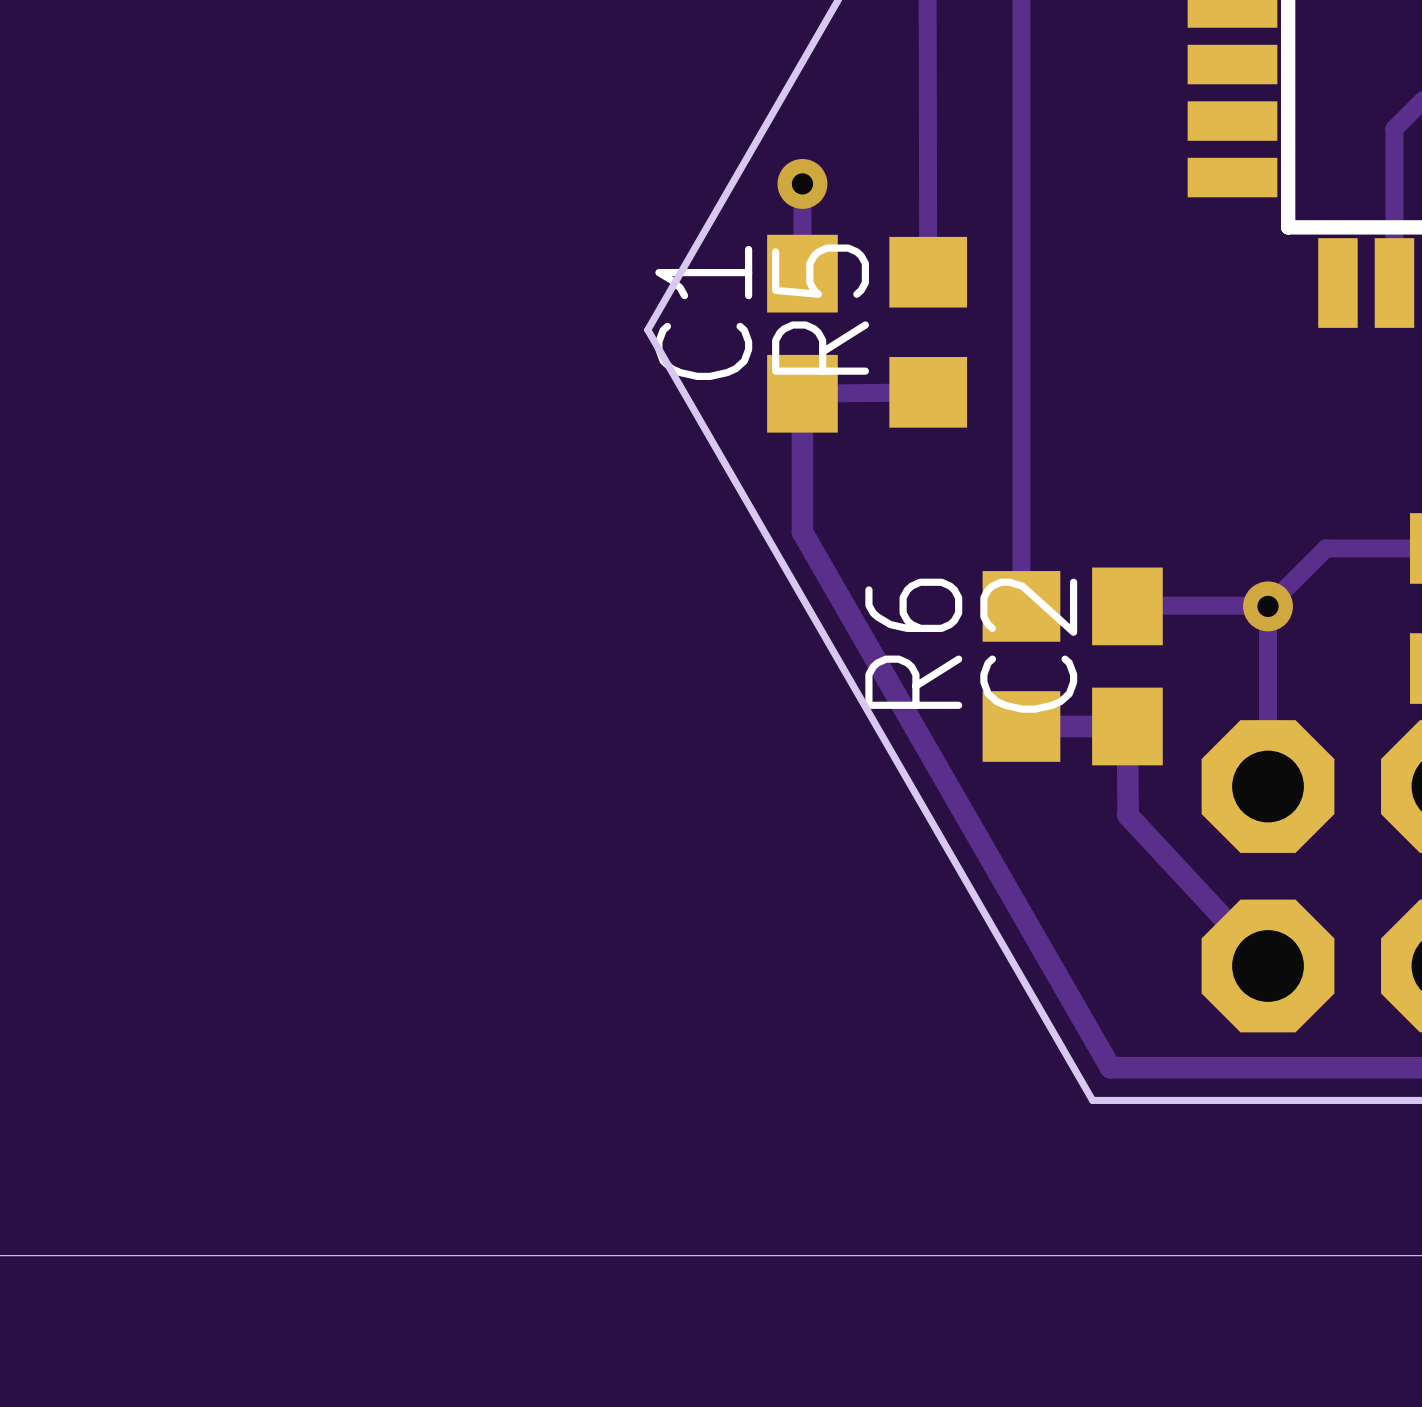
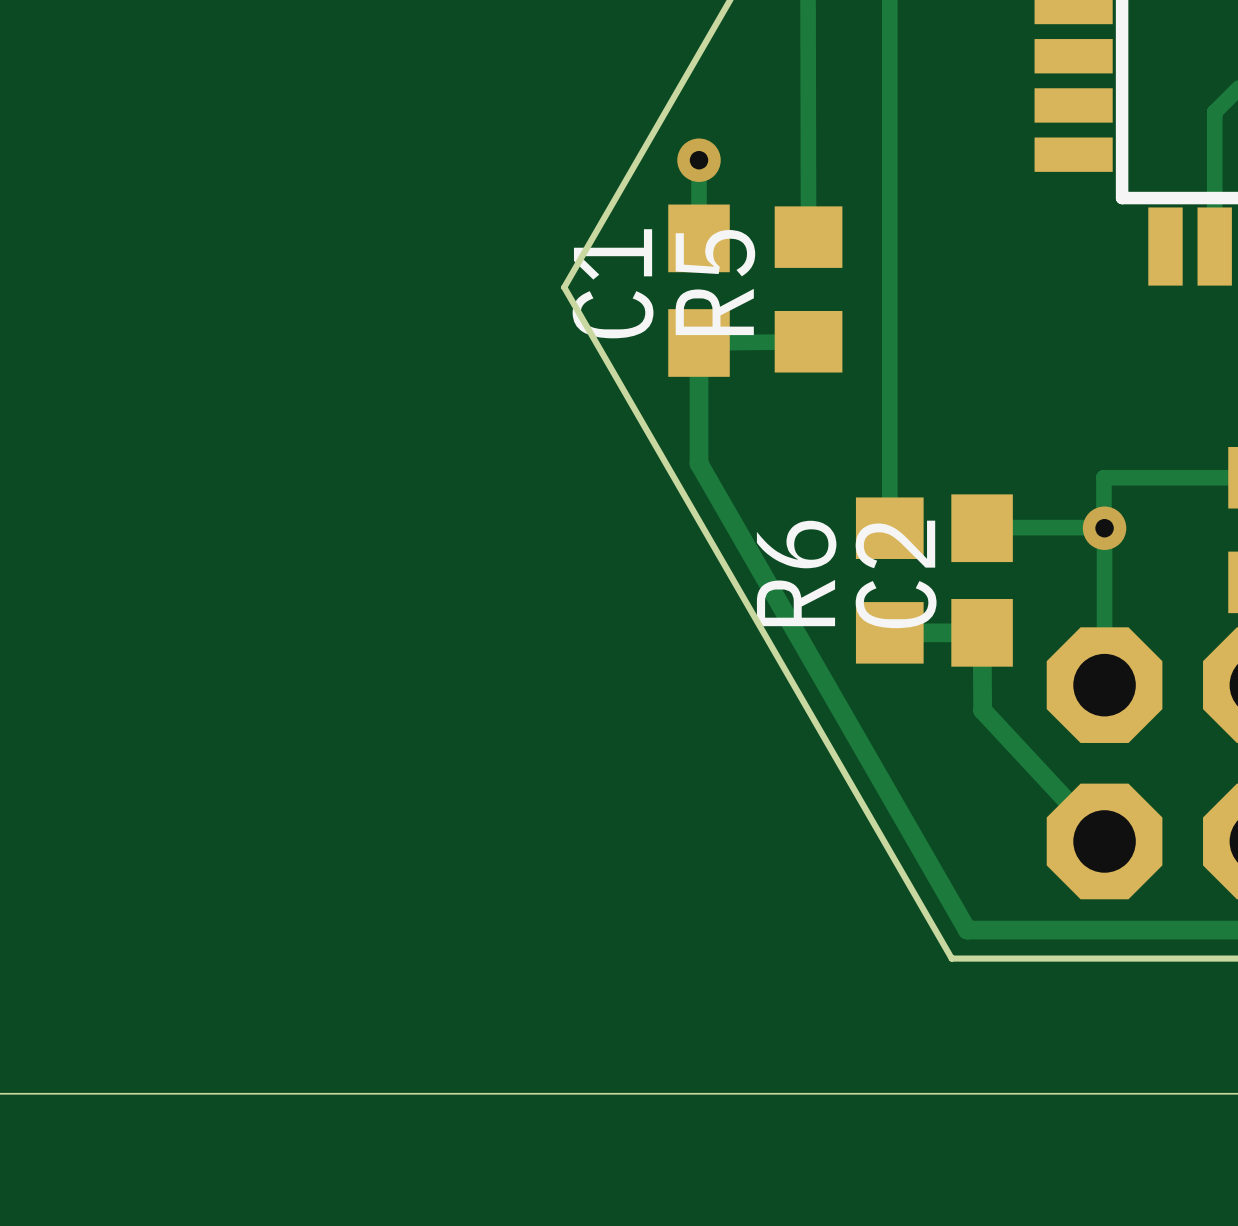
track: (1325, 548) (1268, 606) -> (1155, 477) (1103, 477) (1103, 528) (1104, 525)

